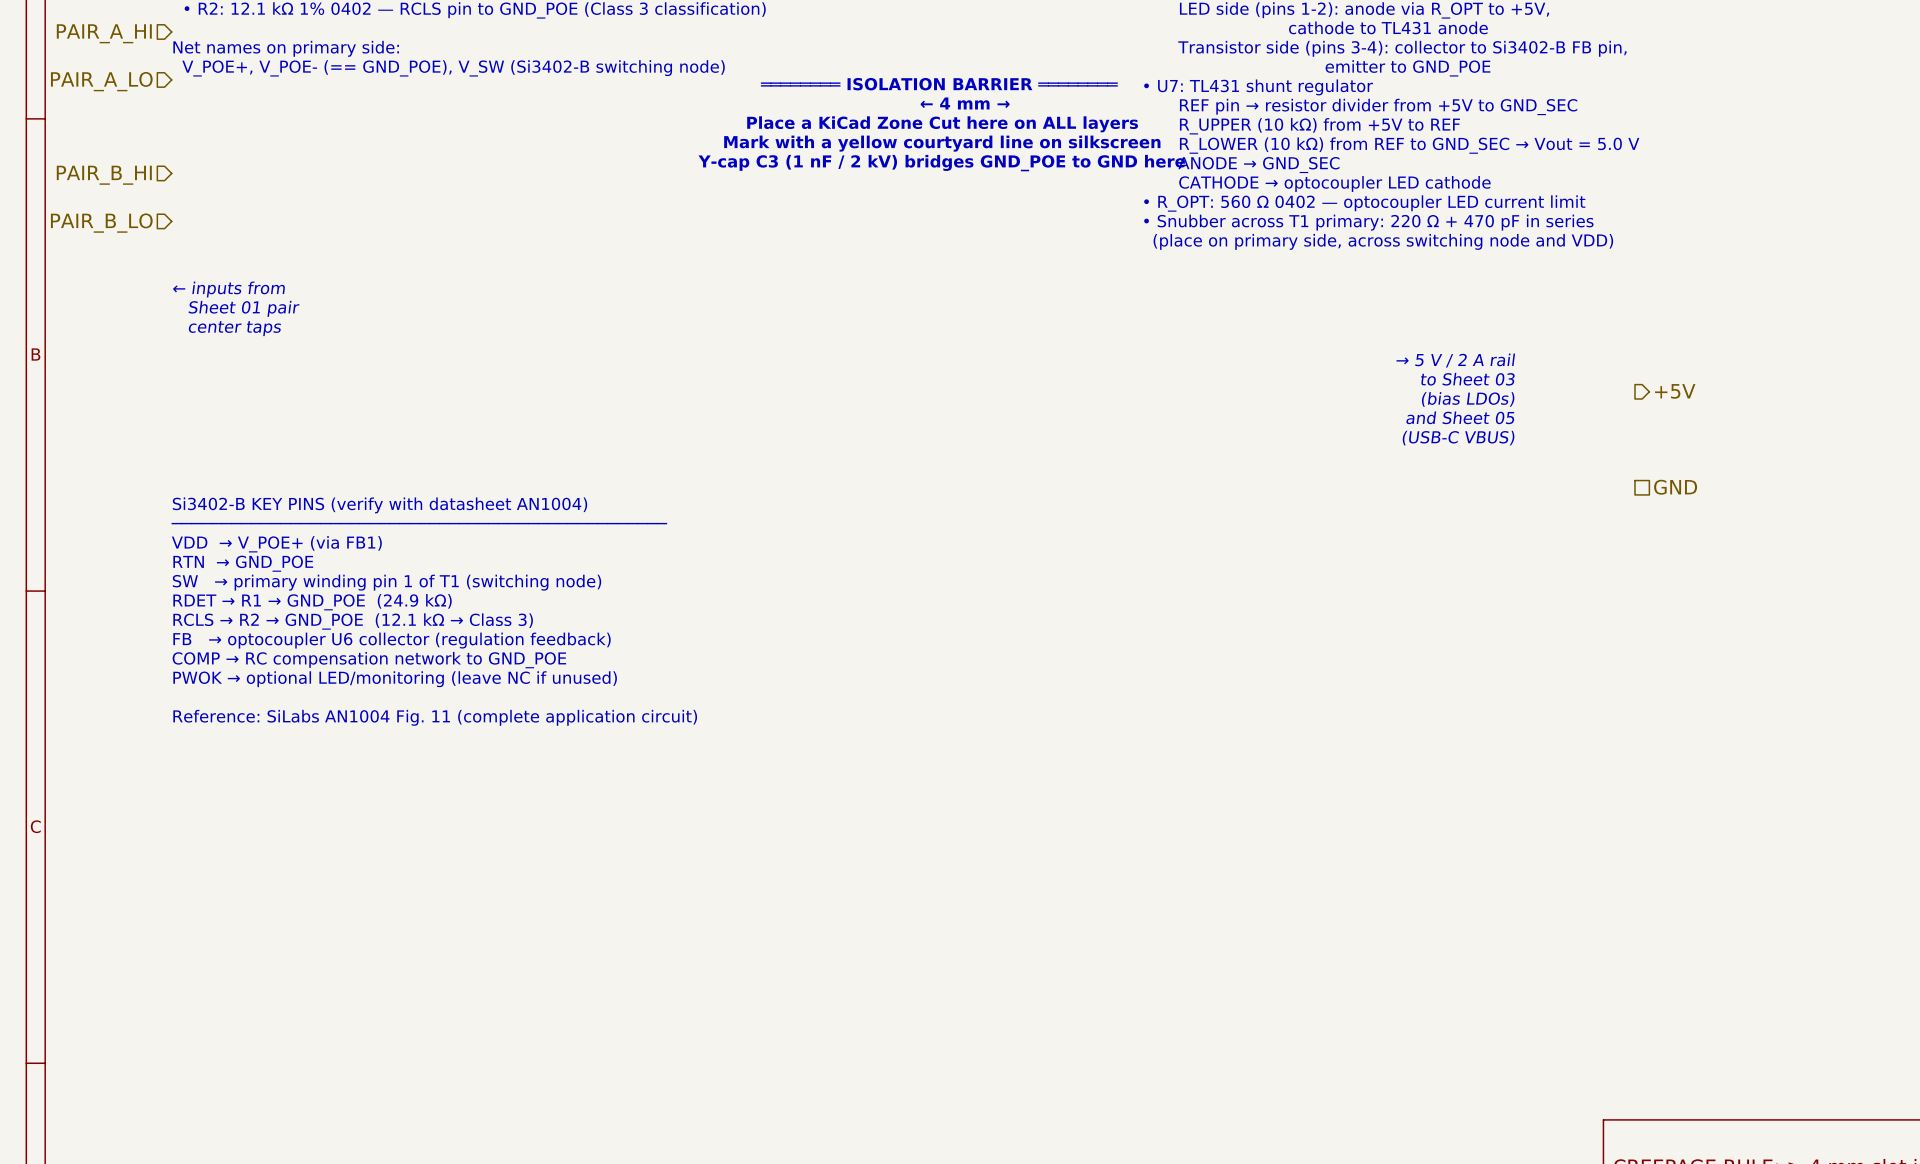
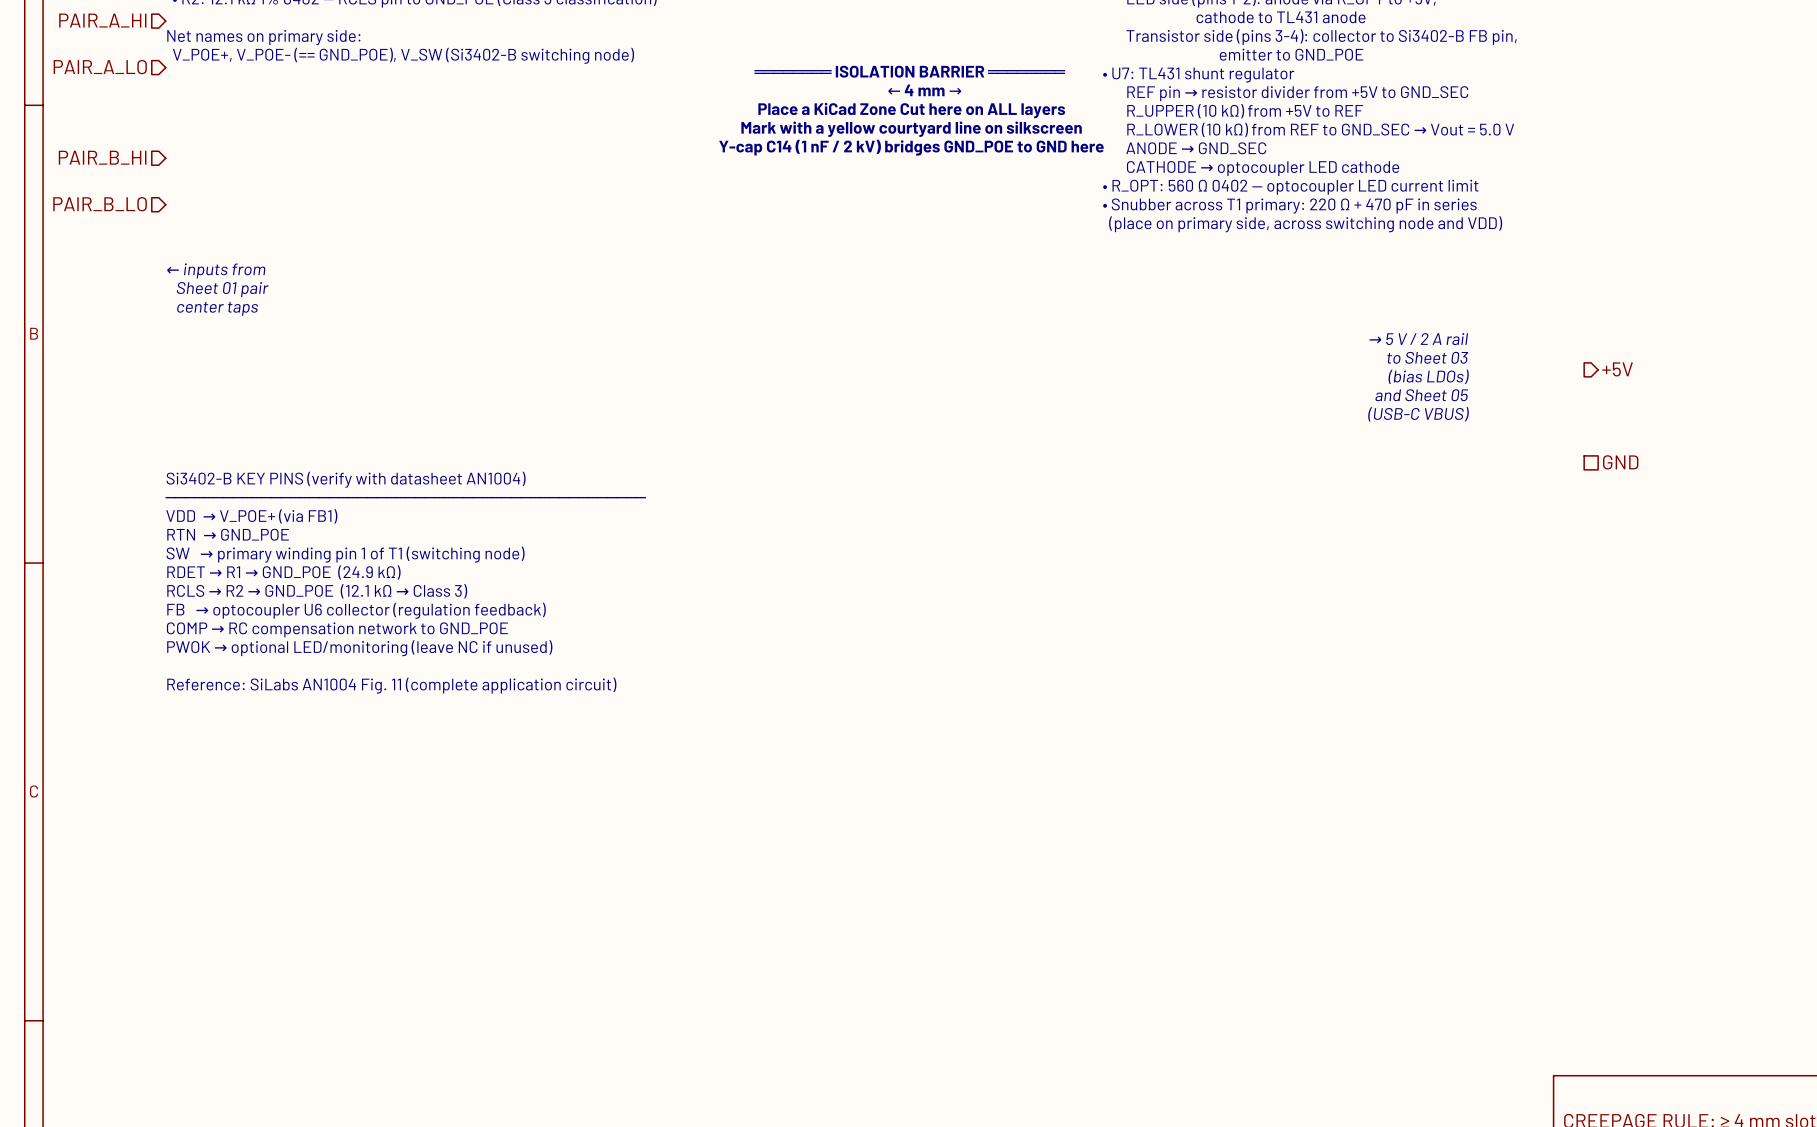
text: Y-cap C3 (1 nF / 2 kV) bridges GND_POE to GND here (941, 163) -> Y-cap C14 (1 nF / 2 kV) bridges GND_POE to GND here (911, 147)

